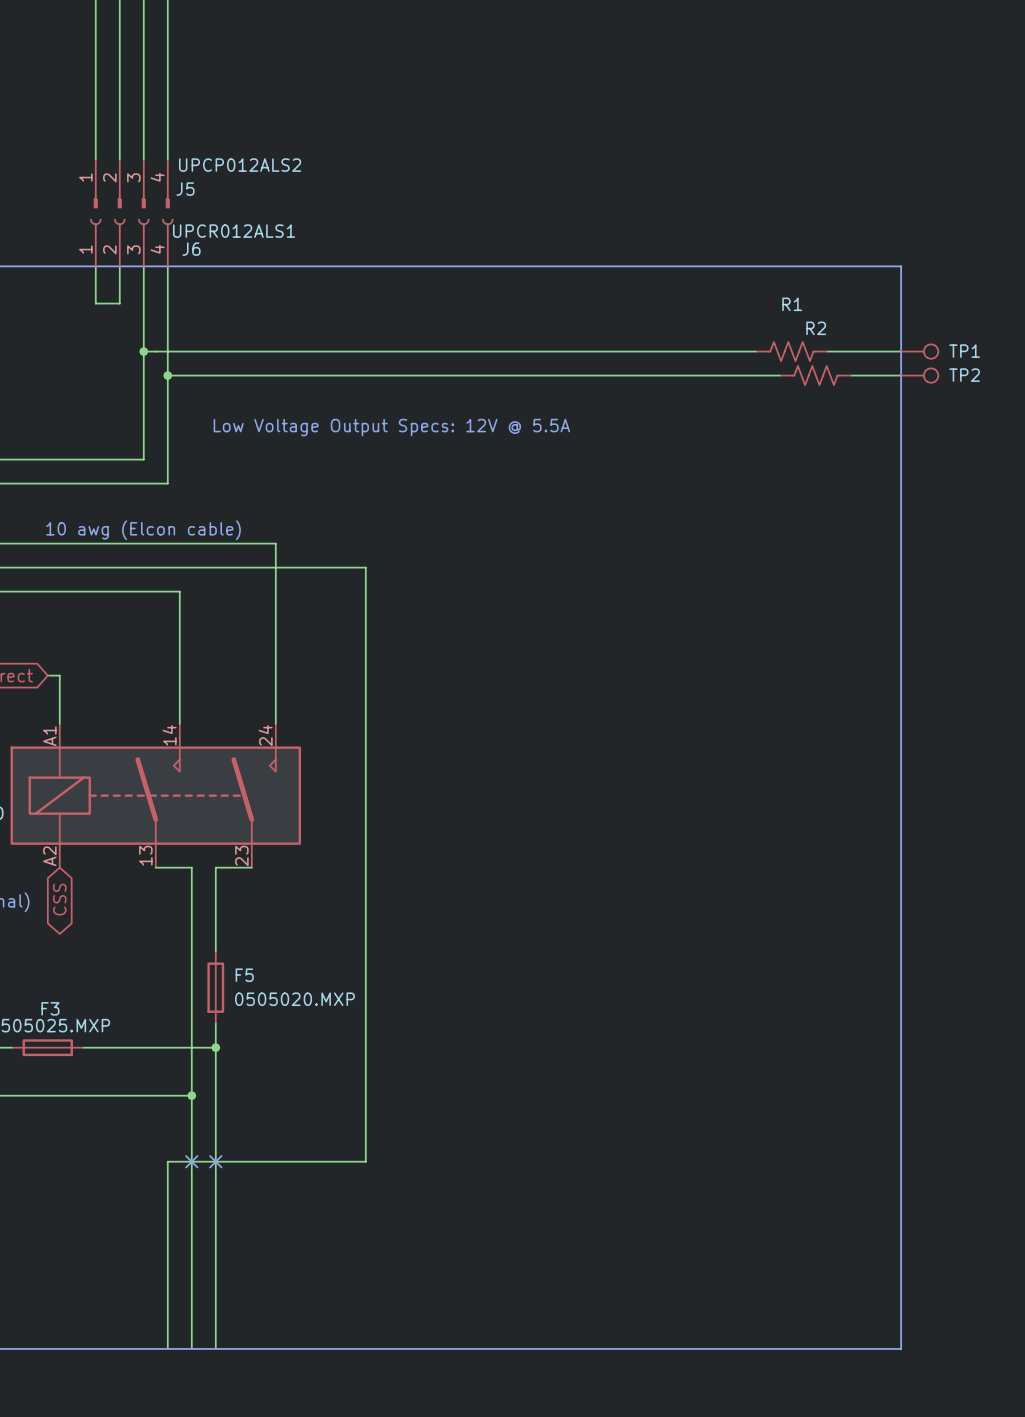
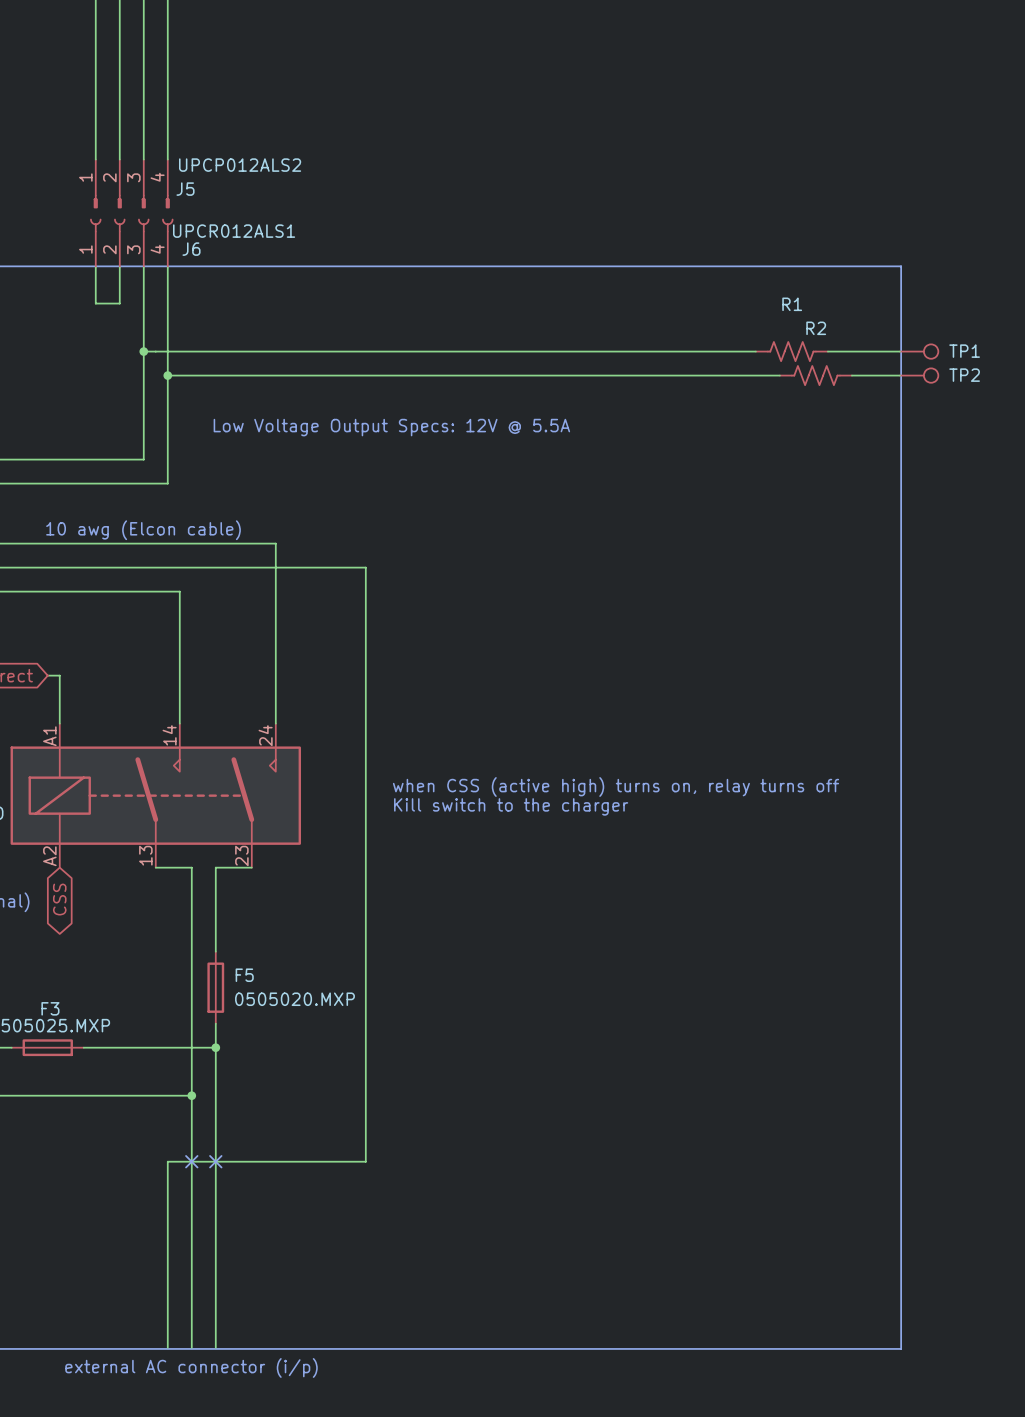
text: none -> when CSS (active high) turns on, relay turns off (616, 787)
text: none -> Kill switch to the charger (511, 806)
text: none -> external AC connector (i/p) (191, 1367)

